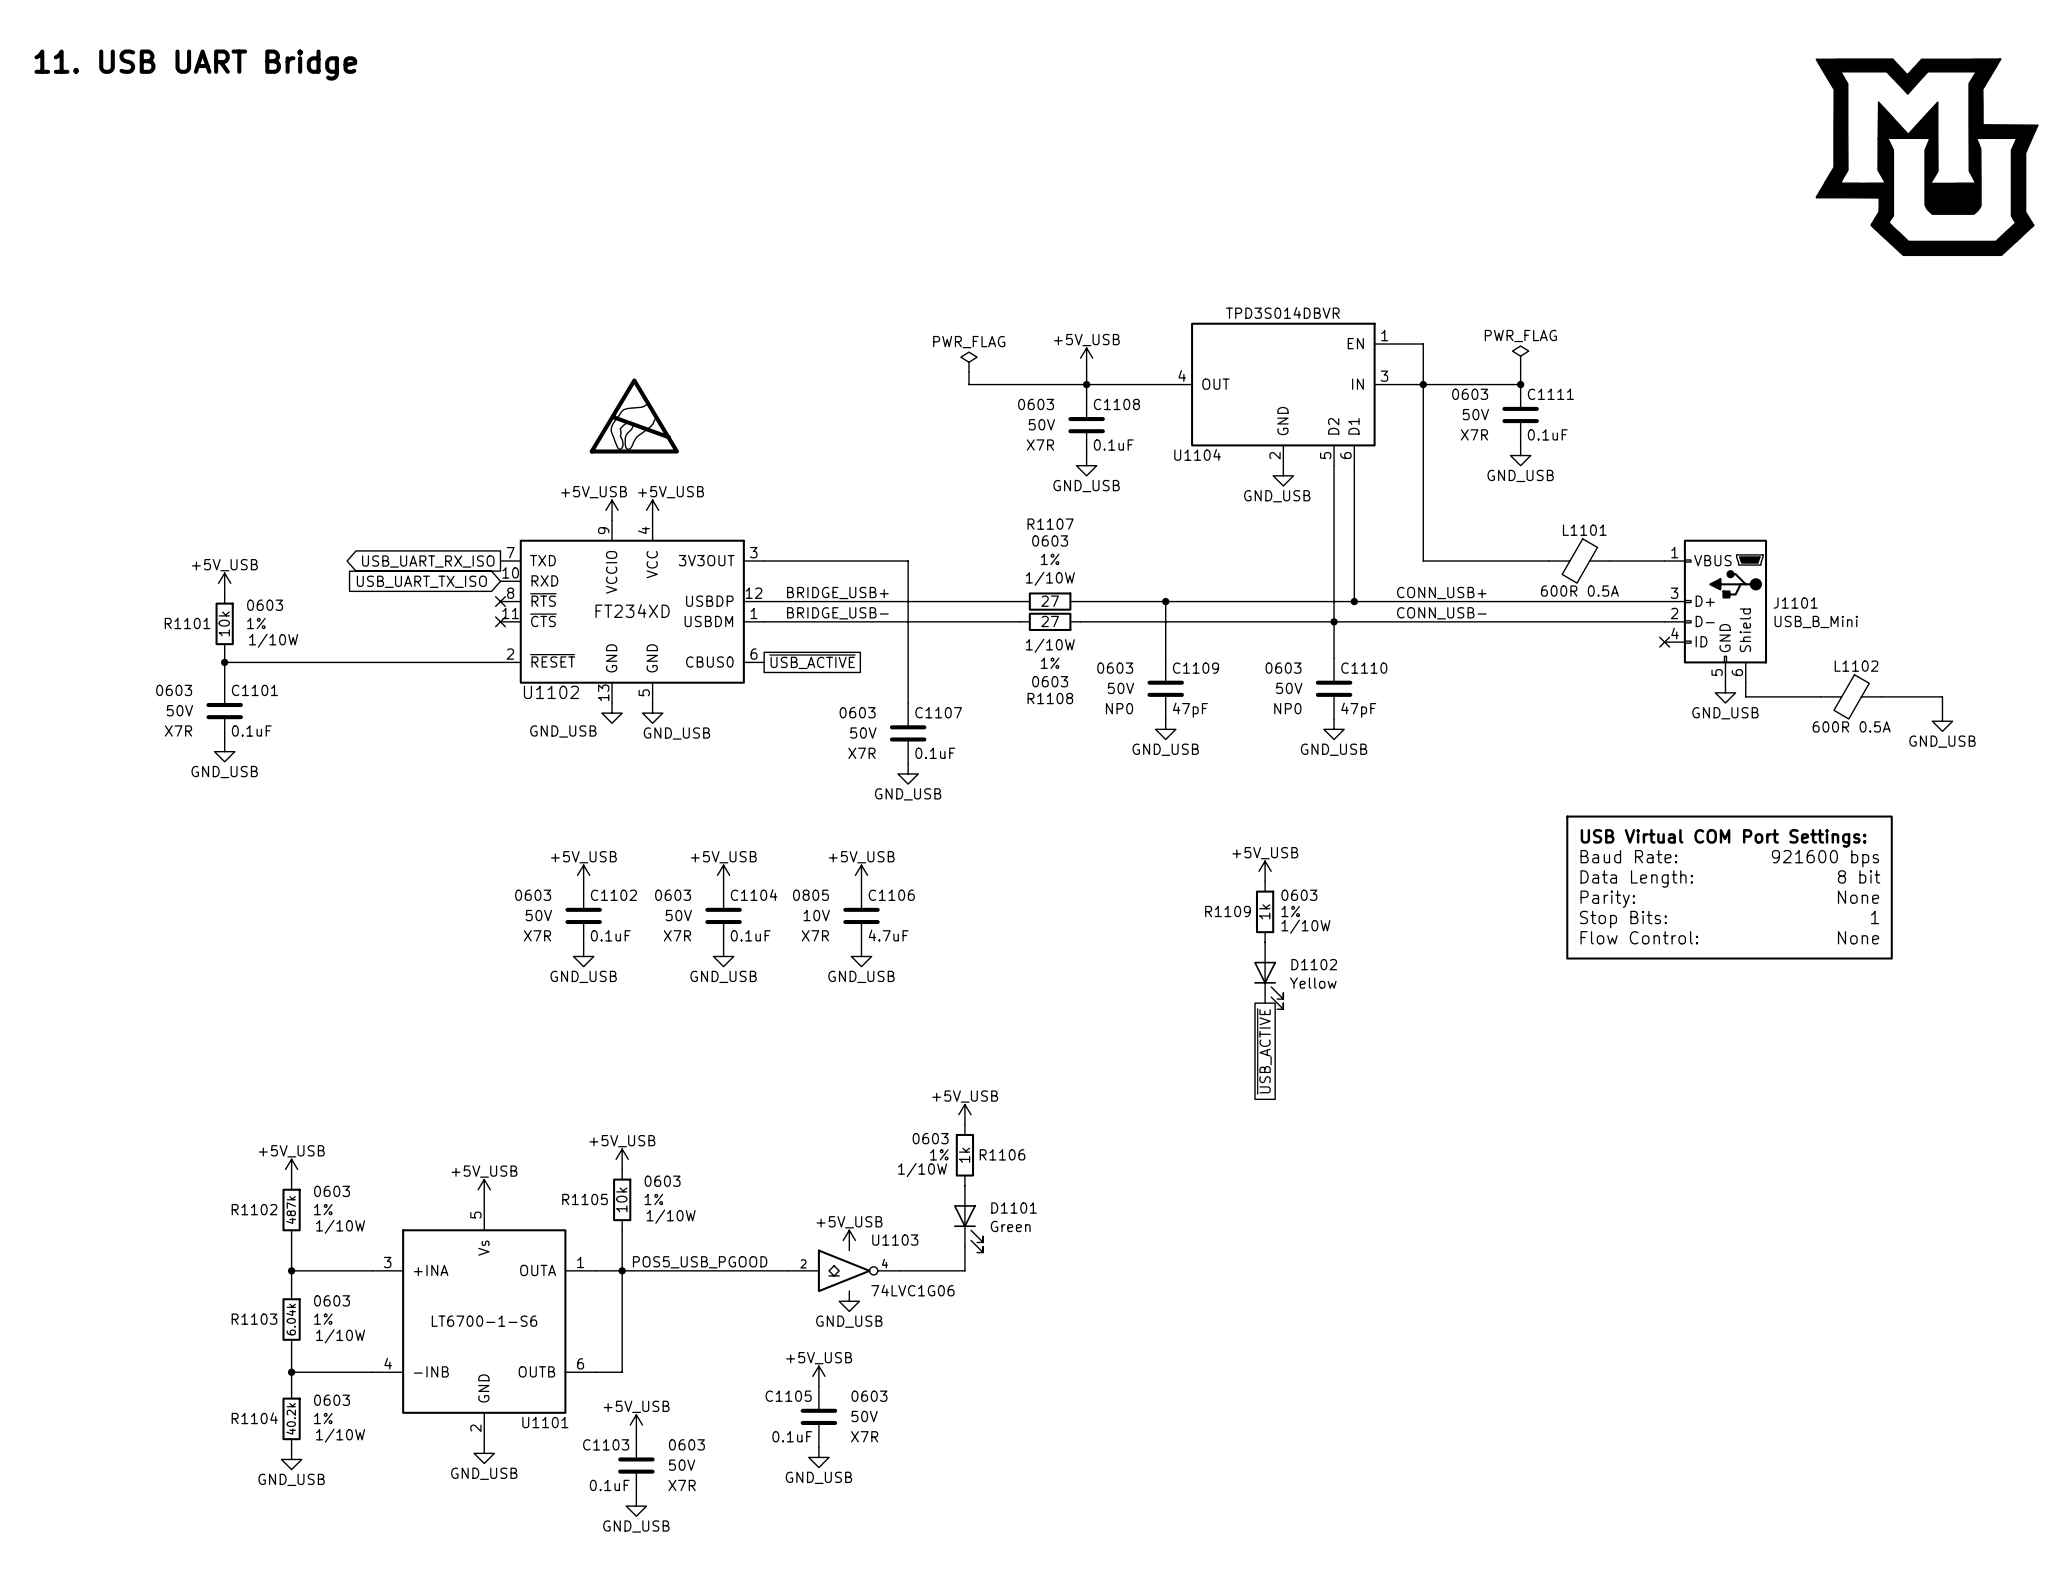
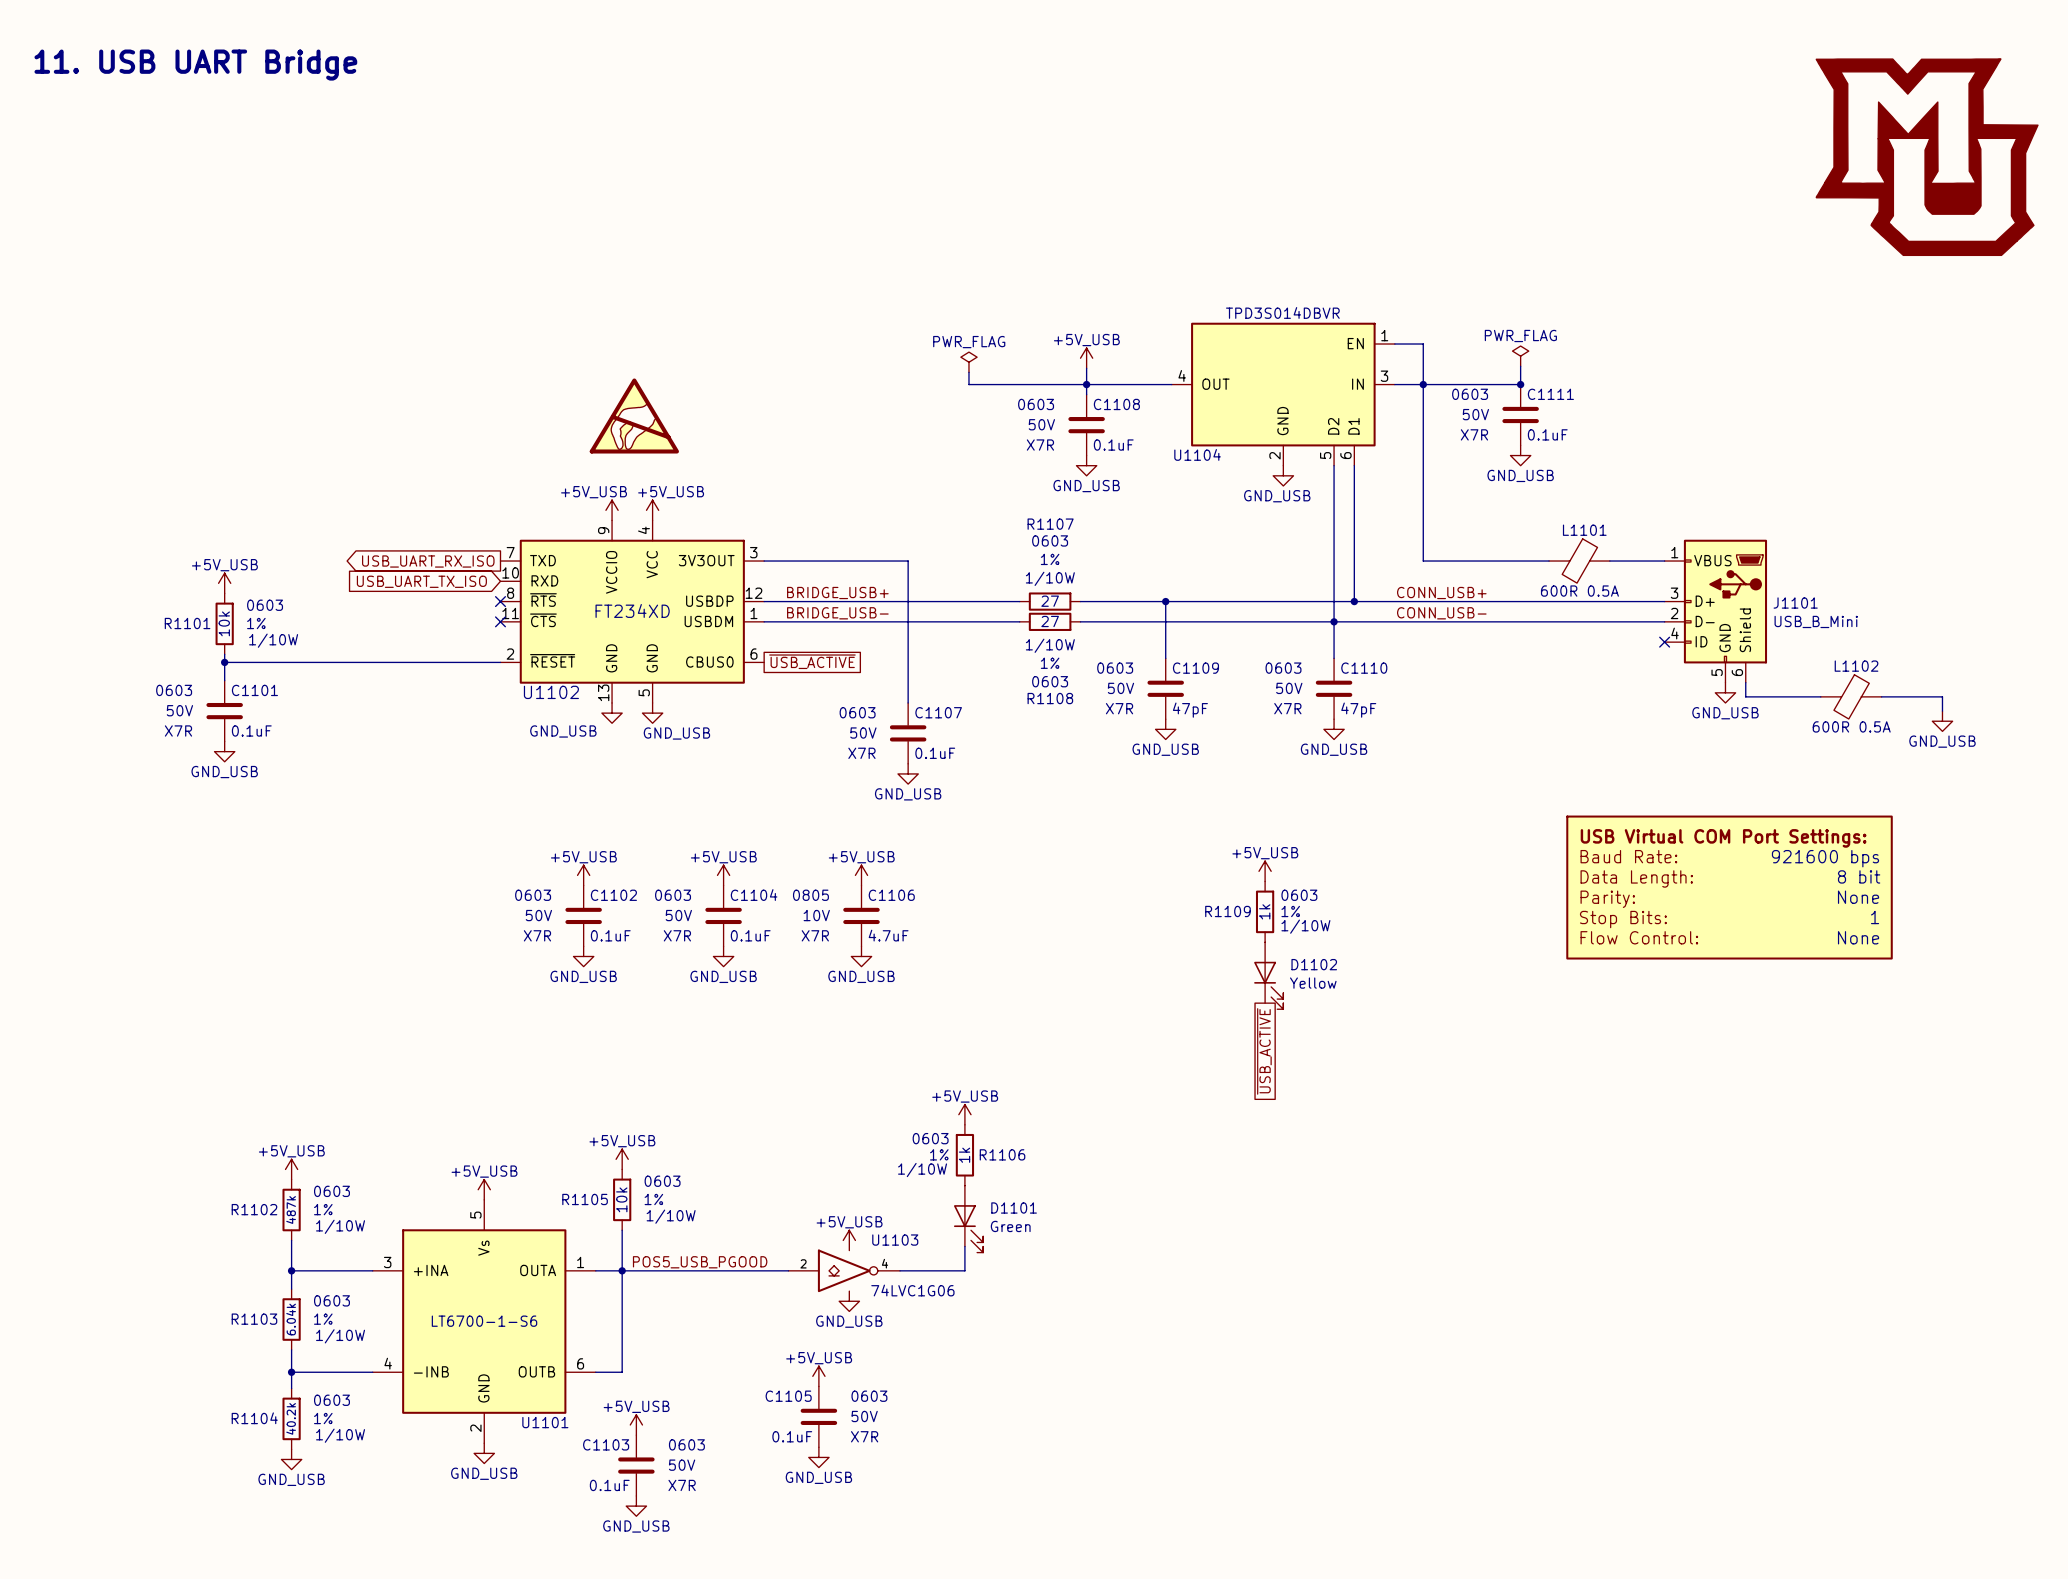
C1109 text: NP0 (1119, 708) -> X7R (1119, 708)
C1110 text: NP0 (1287, 708) -> X7R (1287, 708)

